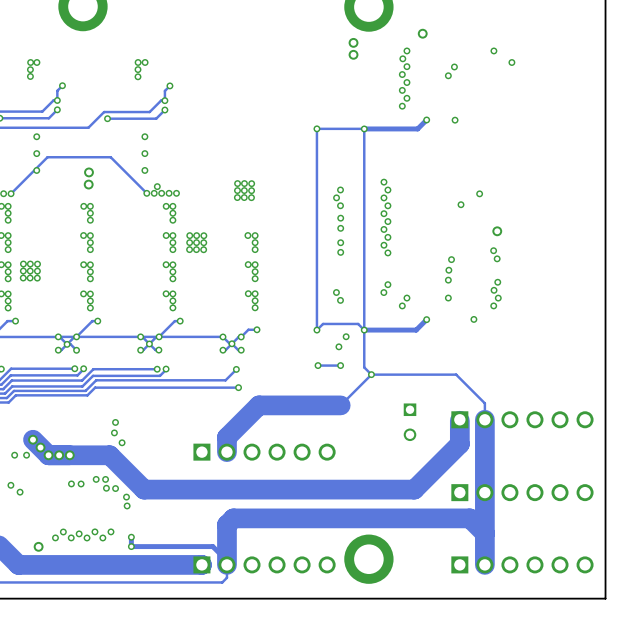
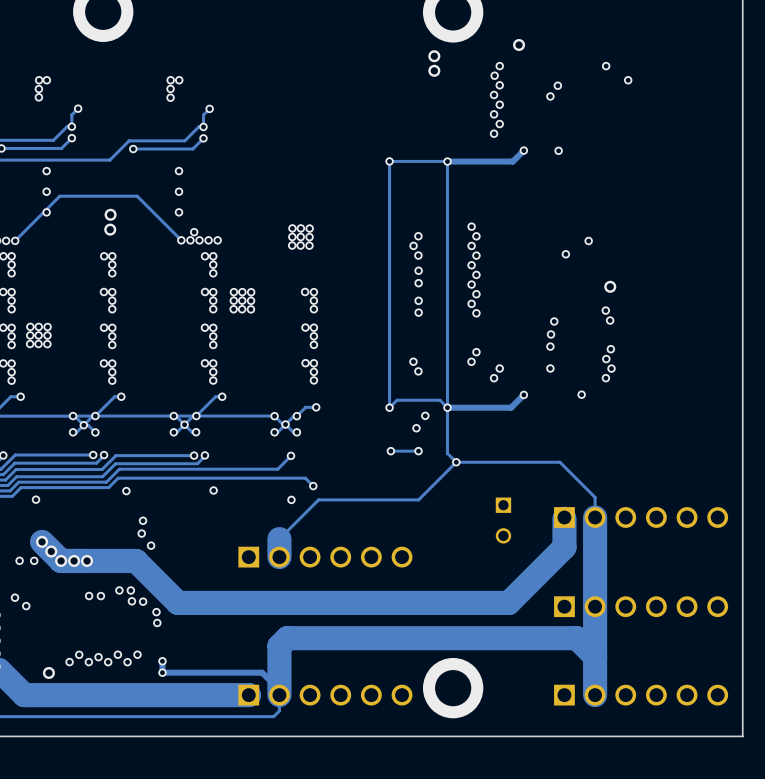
track: none -> (293, 478) (305, 478) (313, 486)
via: (238, 387) -> none
via: none -> (313, 486)
via: none -> (213, 490)
via: none -> (126, 491)
via: none -> (36, 499)
via: none -> (291, 499)
track width: thick (340, 405) (258, 405) (226, 437) -> thin (418, 499) (318, 499) (279, 539)

